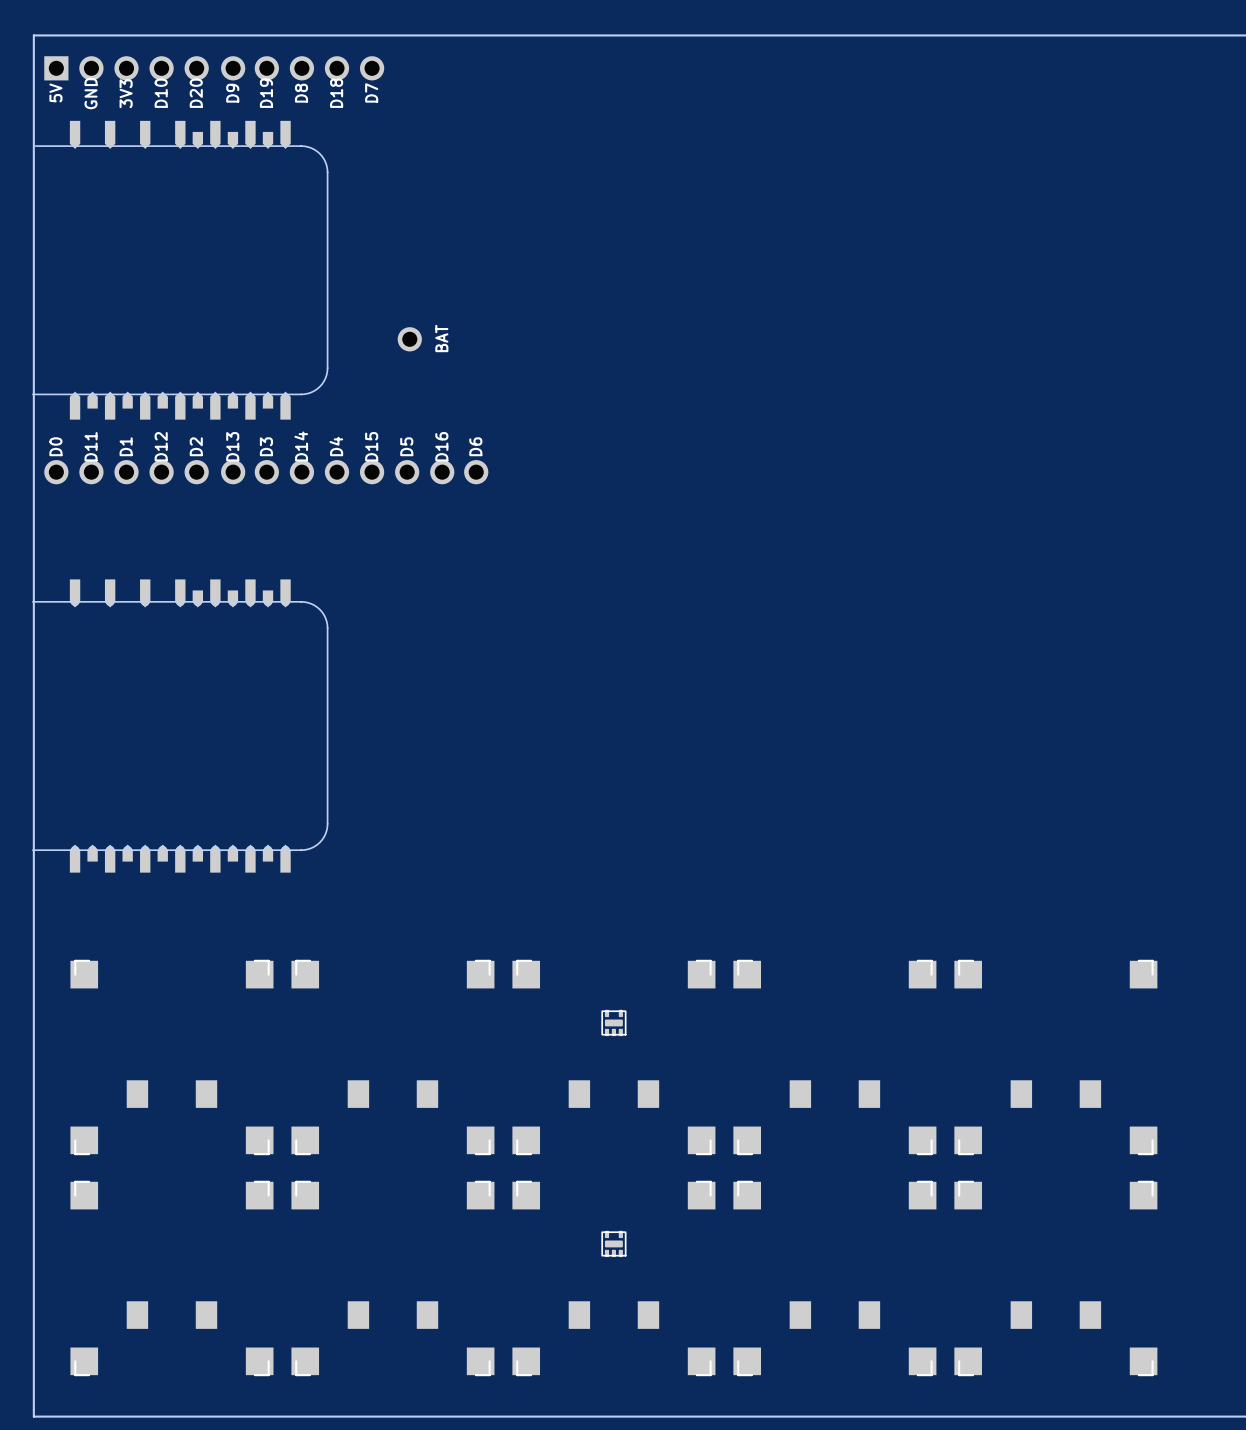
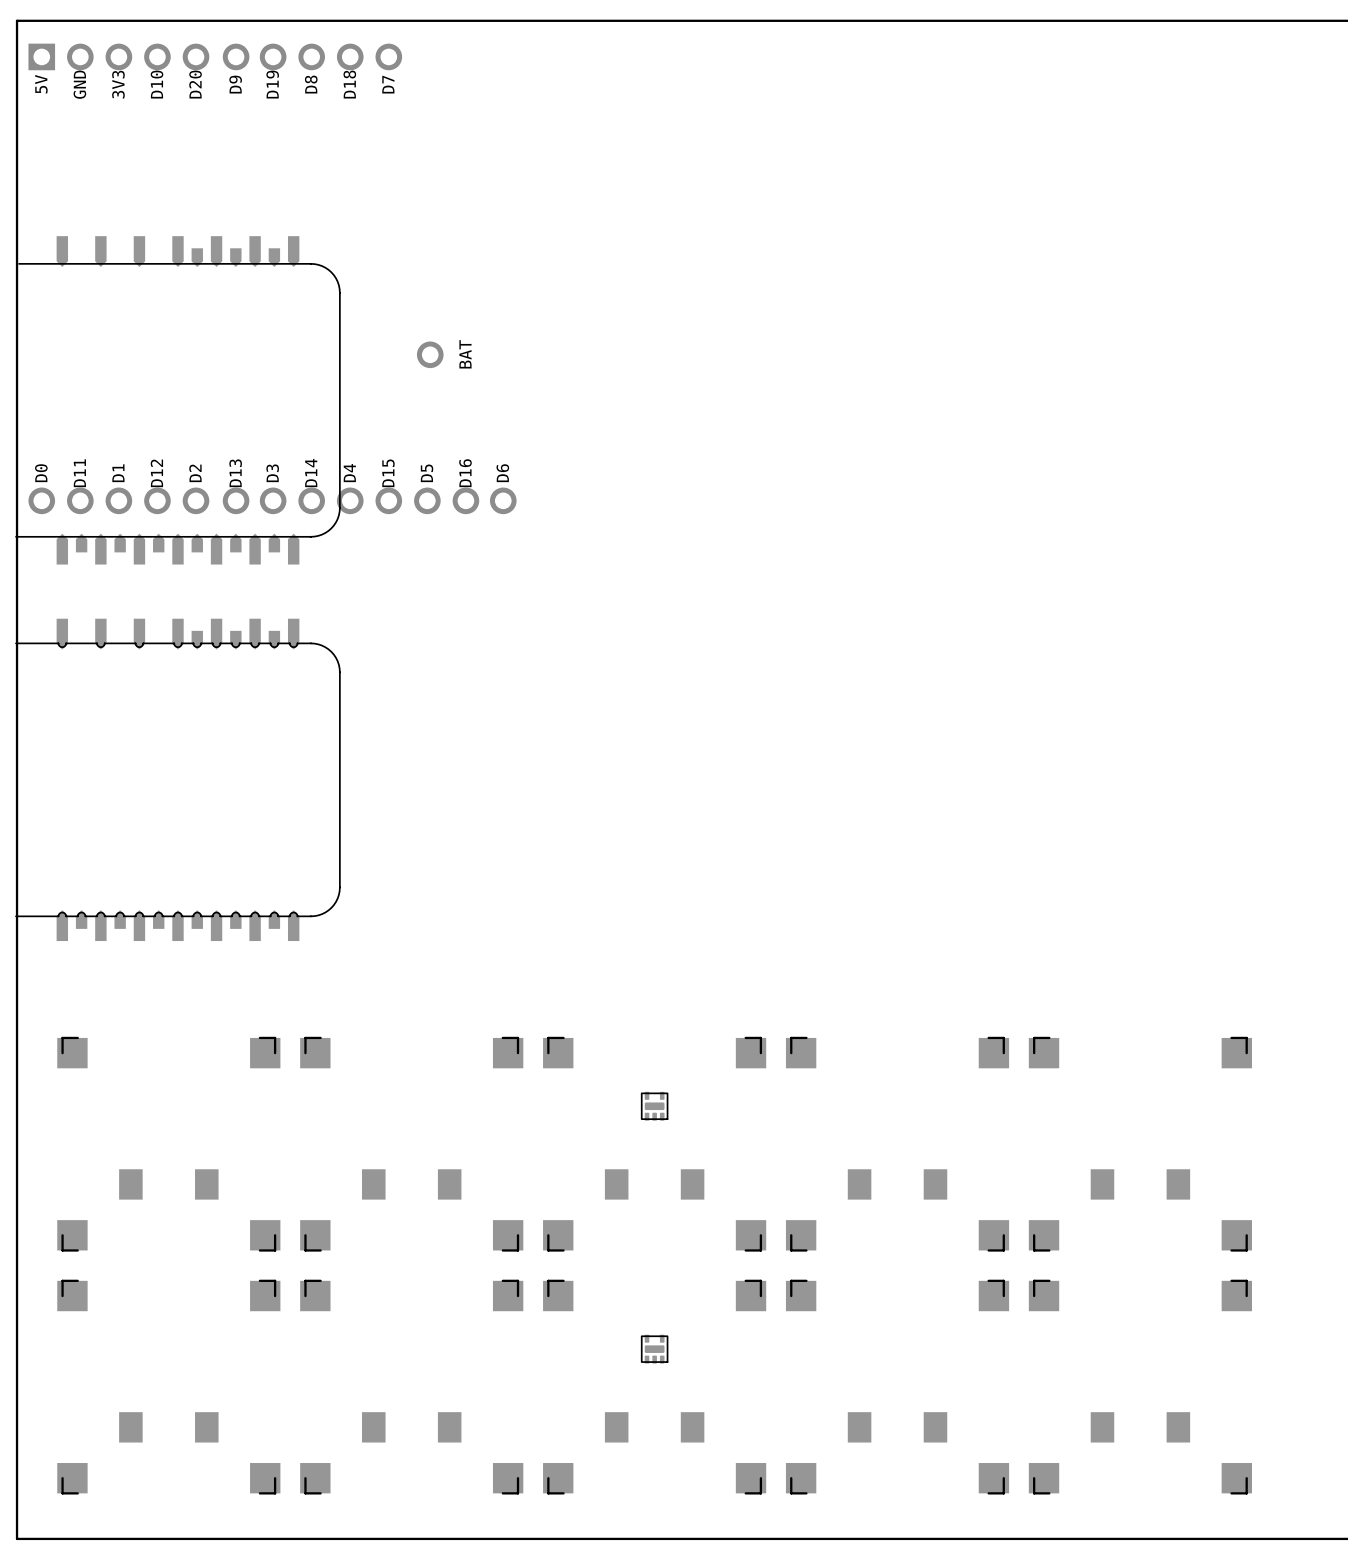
part position: (180, 270) -> (177, 400)

